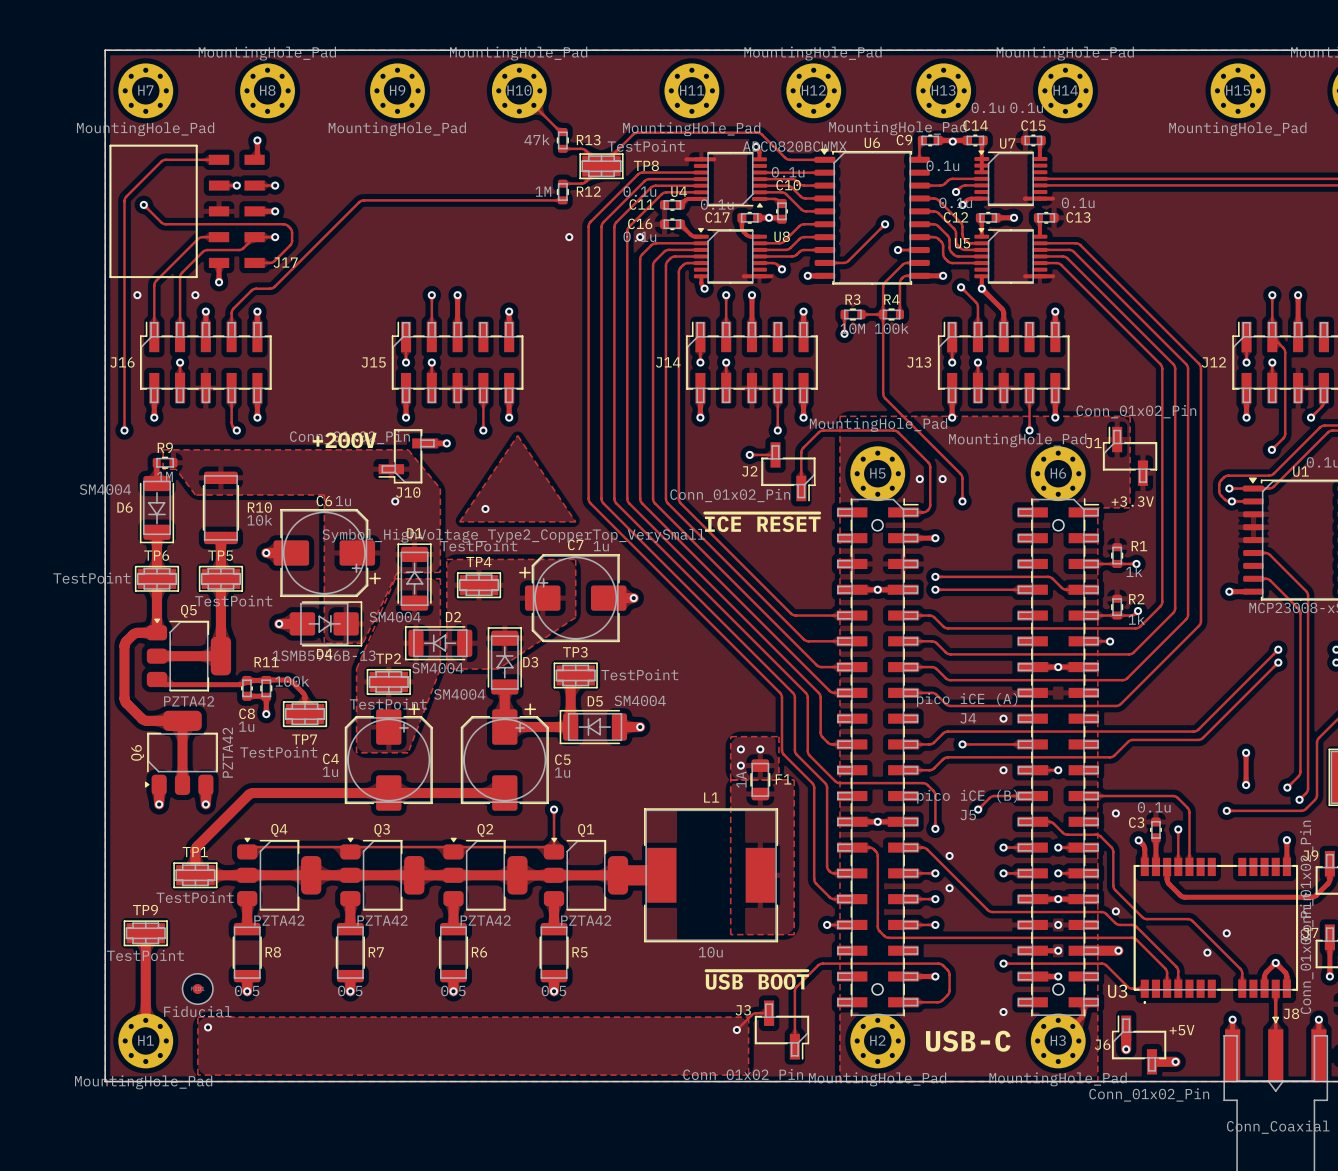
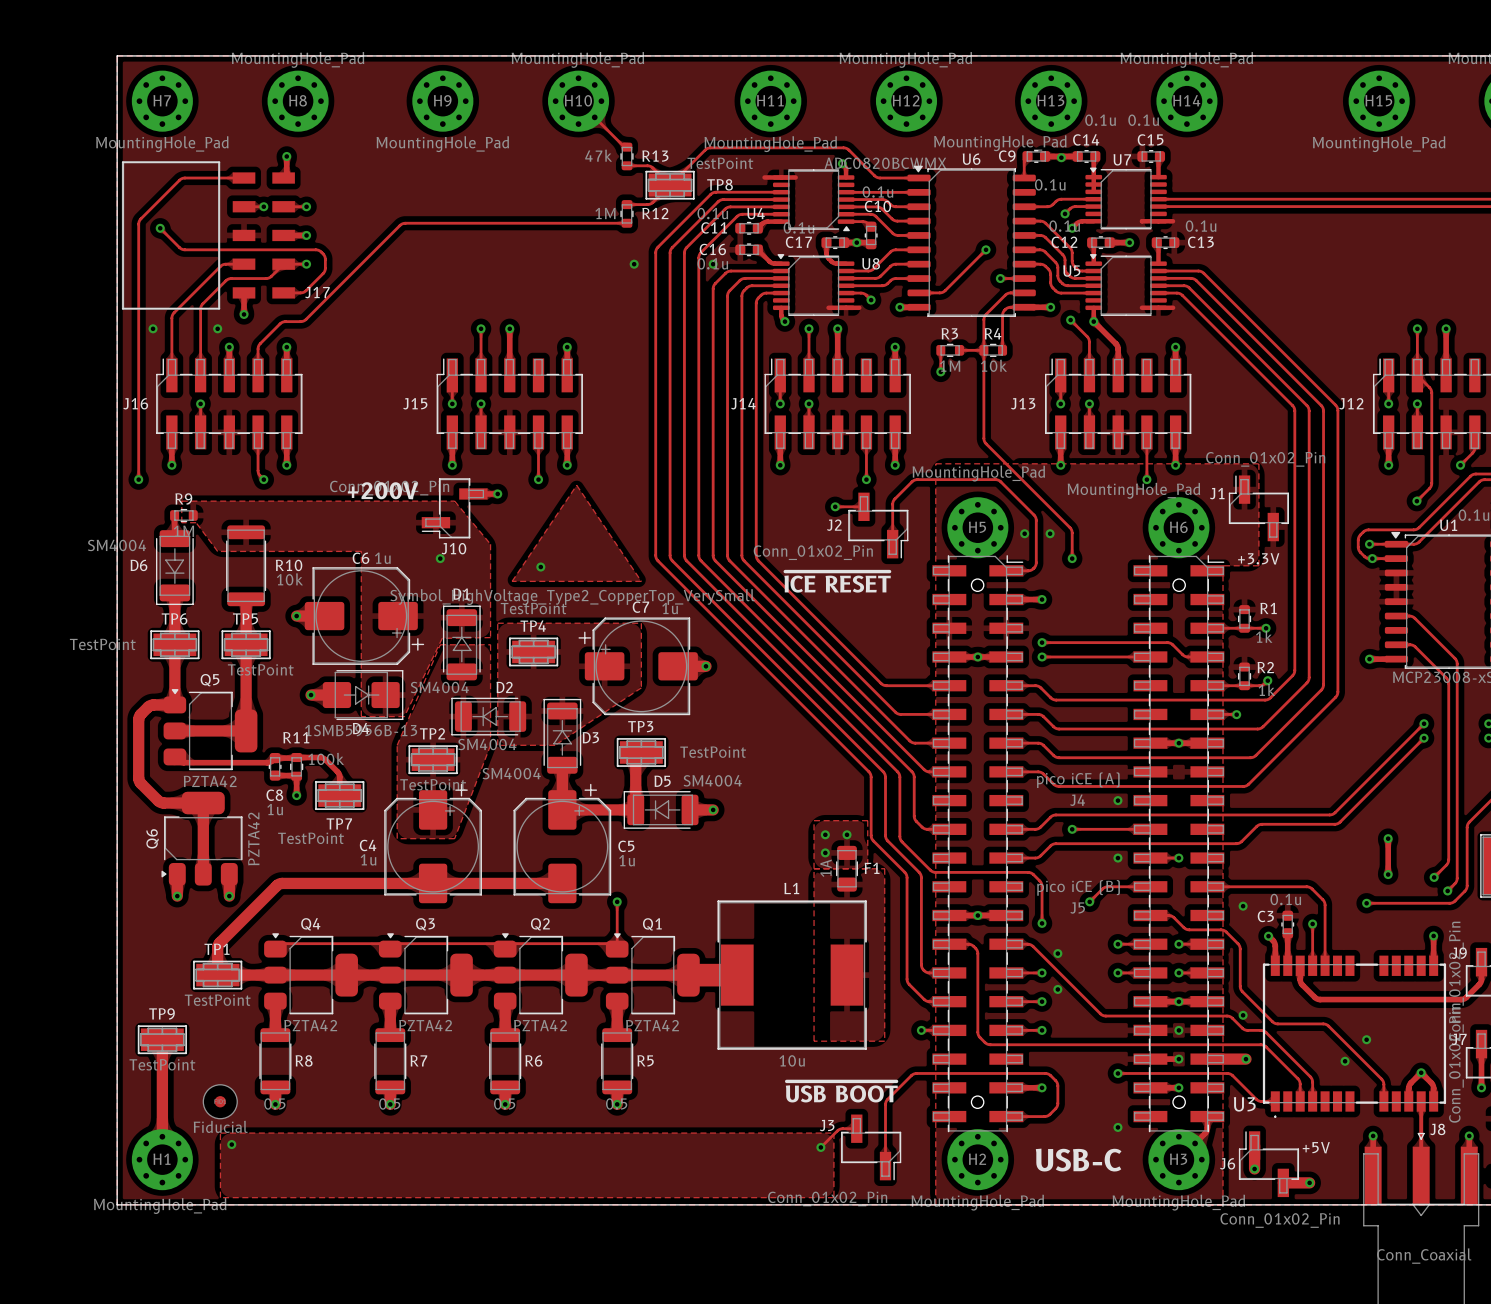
R3 value: 10M (852, 328) -> 1M (950, 366)
R4 value: 100k (891, 328) -> 10k (993, 365)

